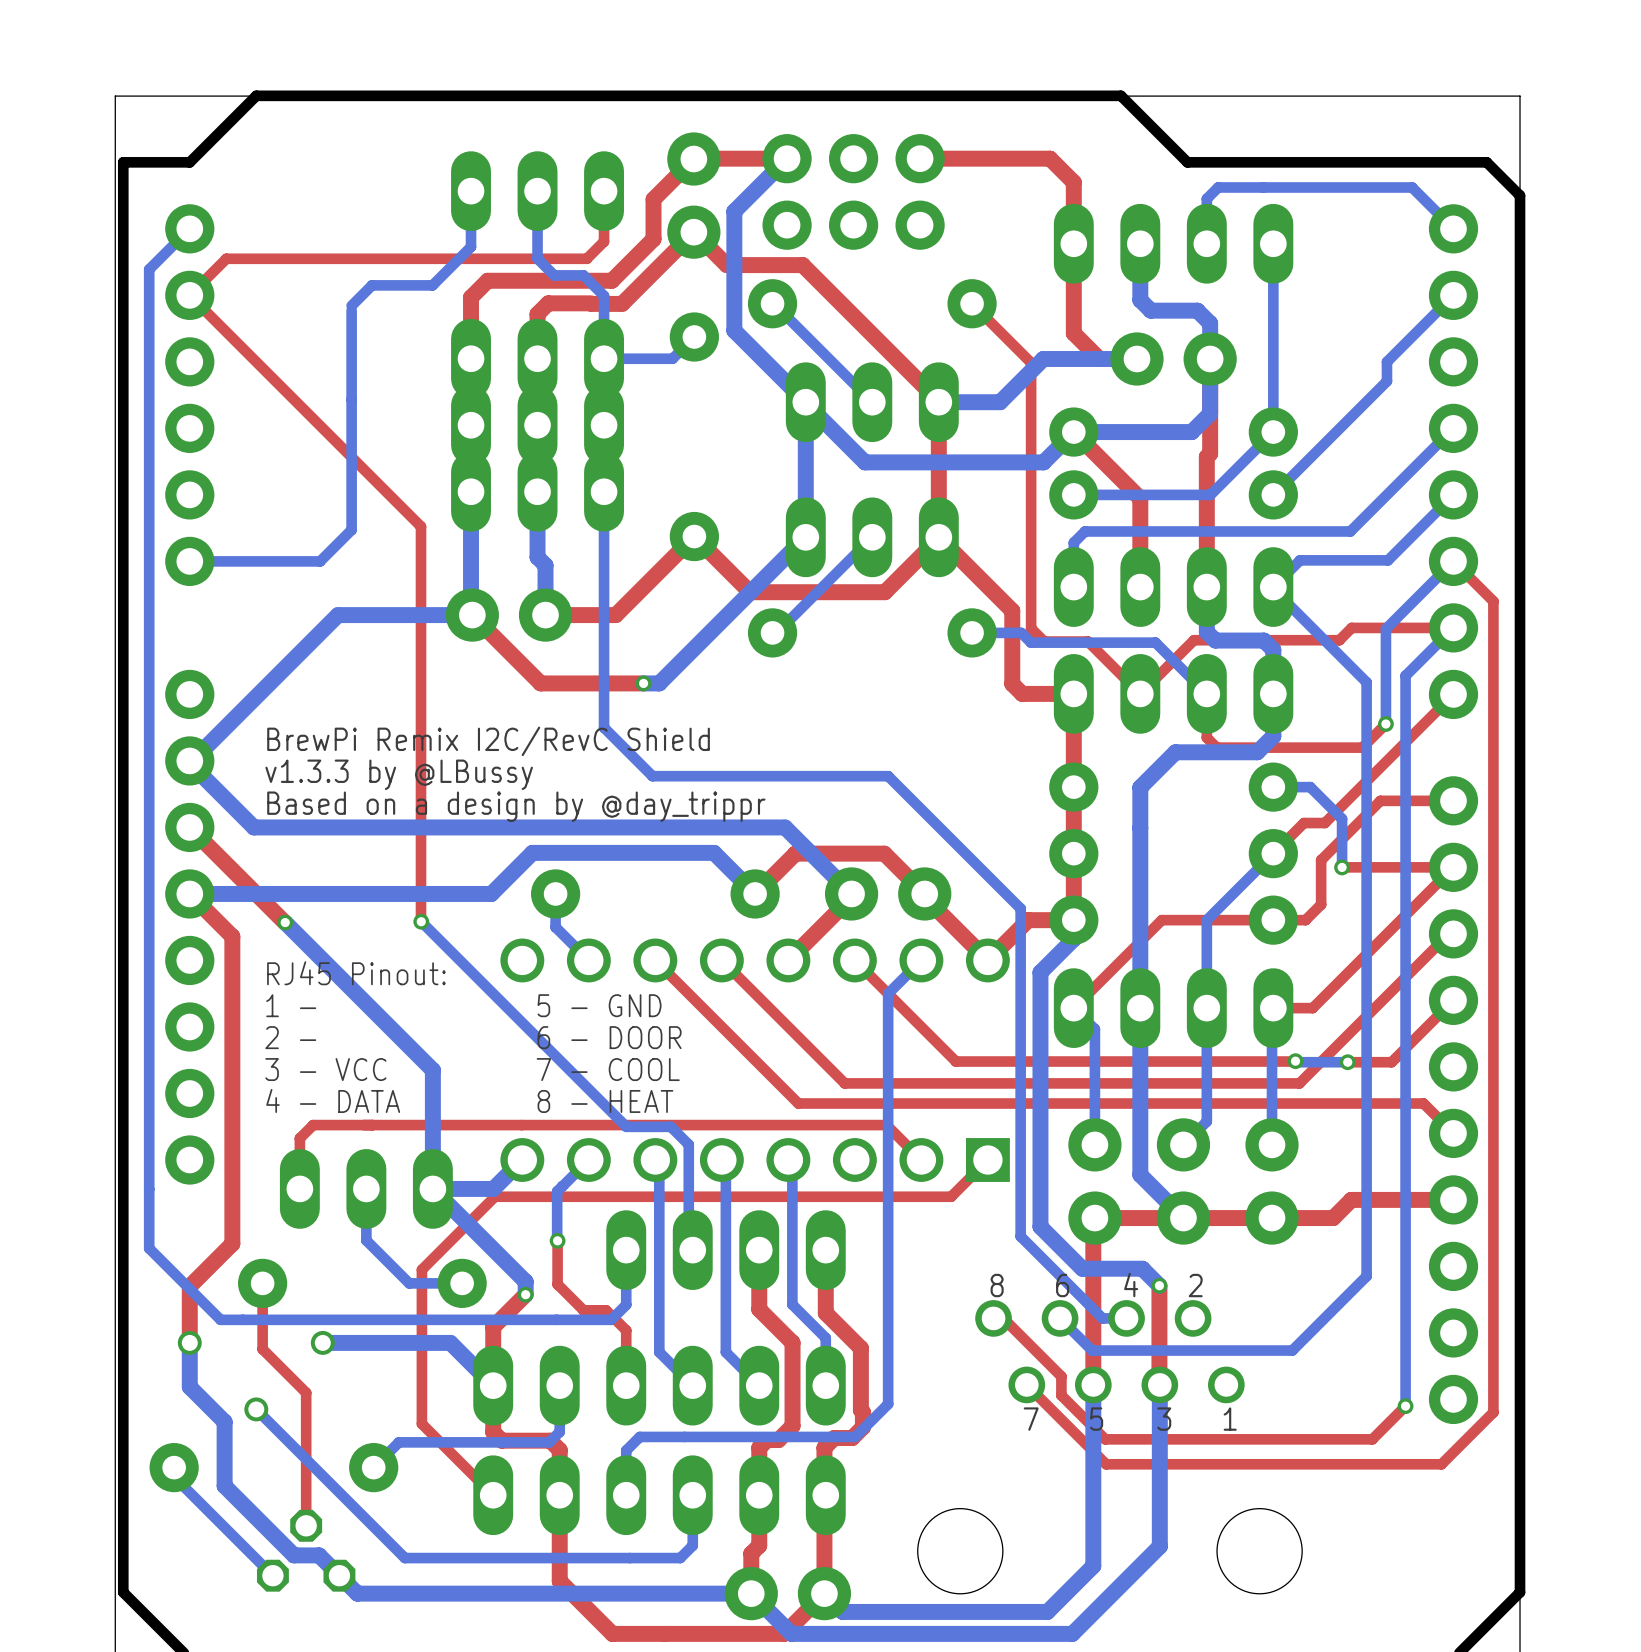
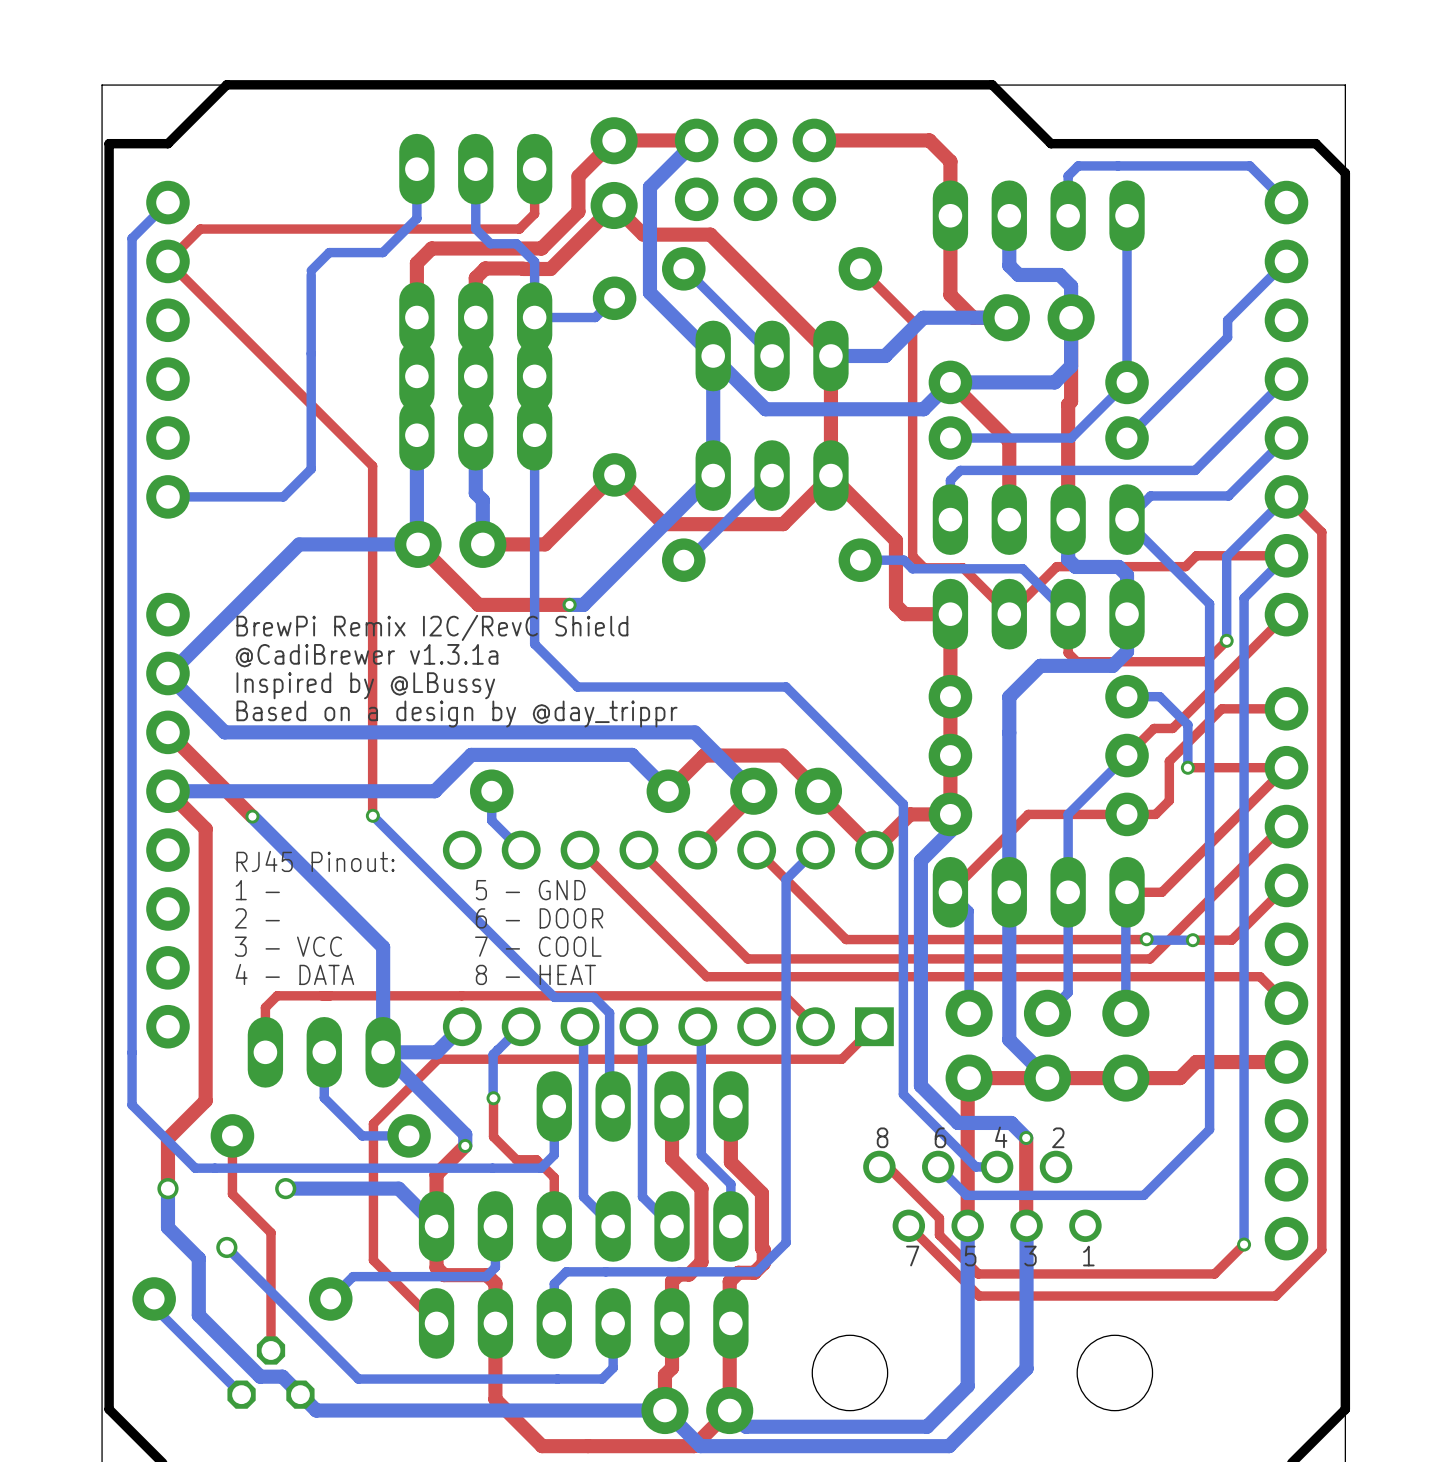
text: none -> BrewPi Remix I2C/RevC Shield (432, 627)
text: BrewPi Remix I2C/RevC Shield (488, 741) -> @CadiBrewer v1.3.1a (367, 655)
text: v1.3.3 by @LBussy (399, 774) -> Inspired by @LBussy (365, 685)

